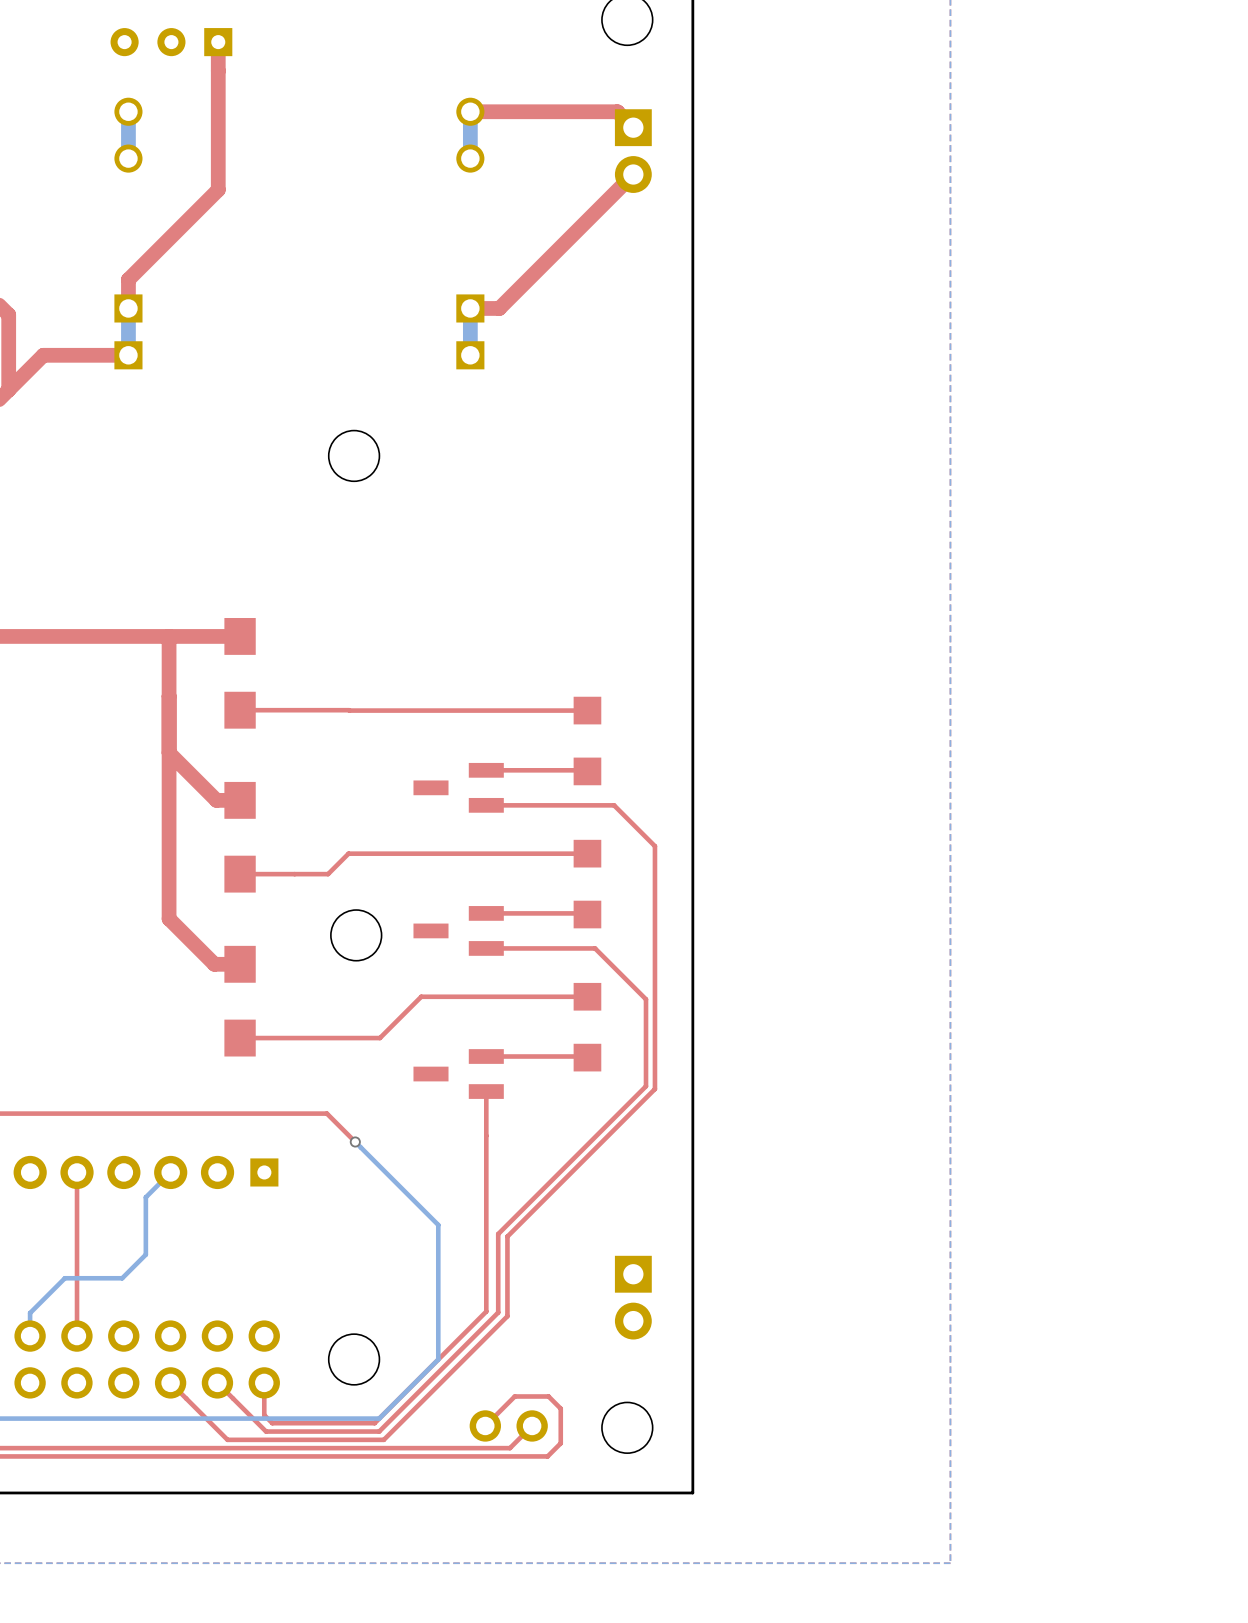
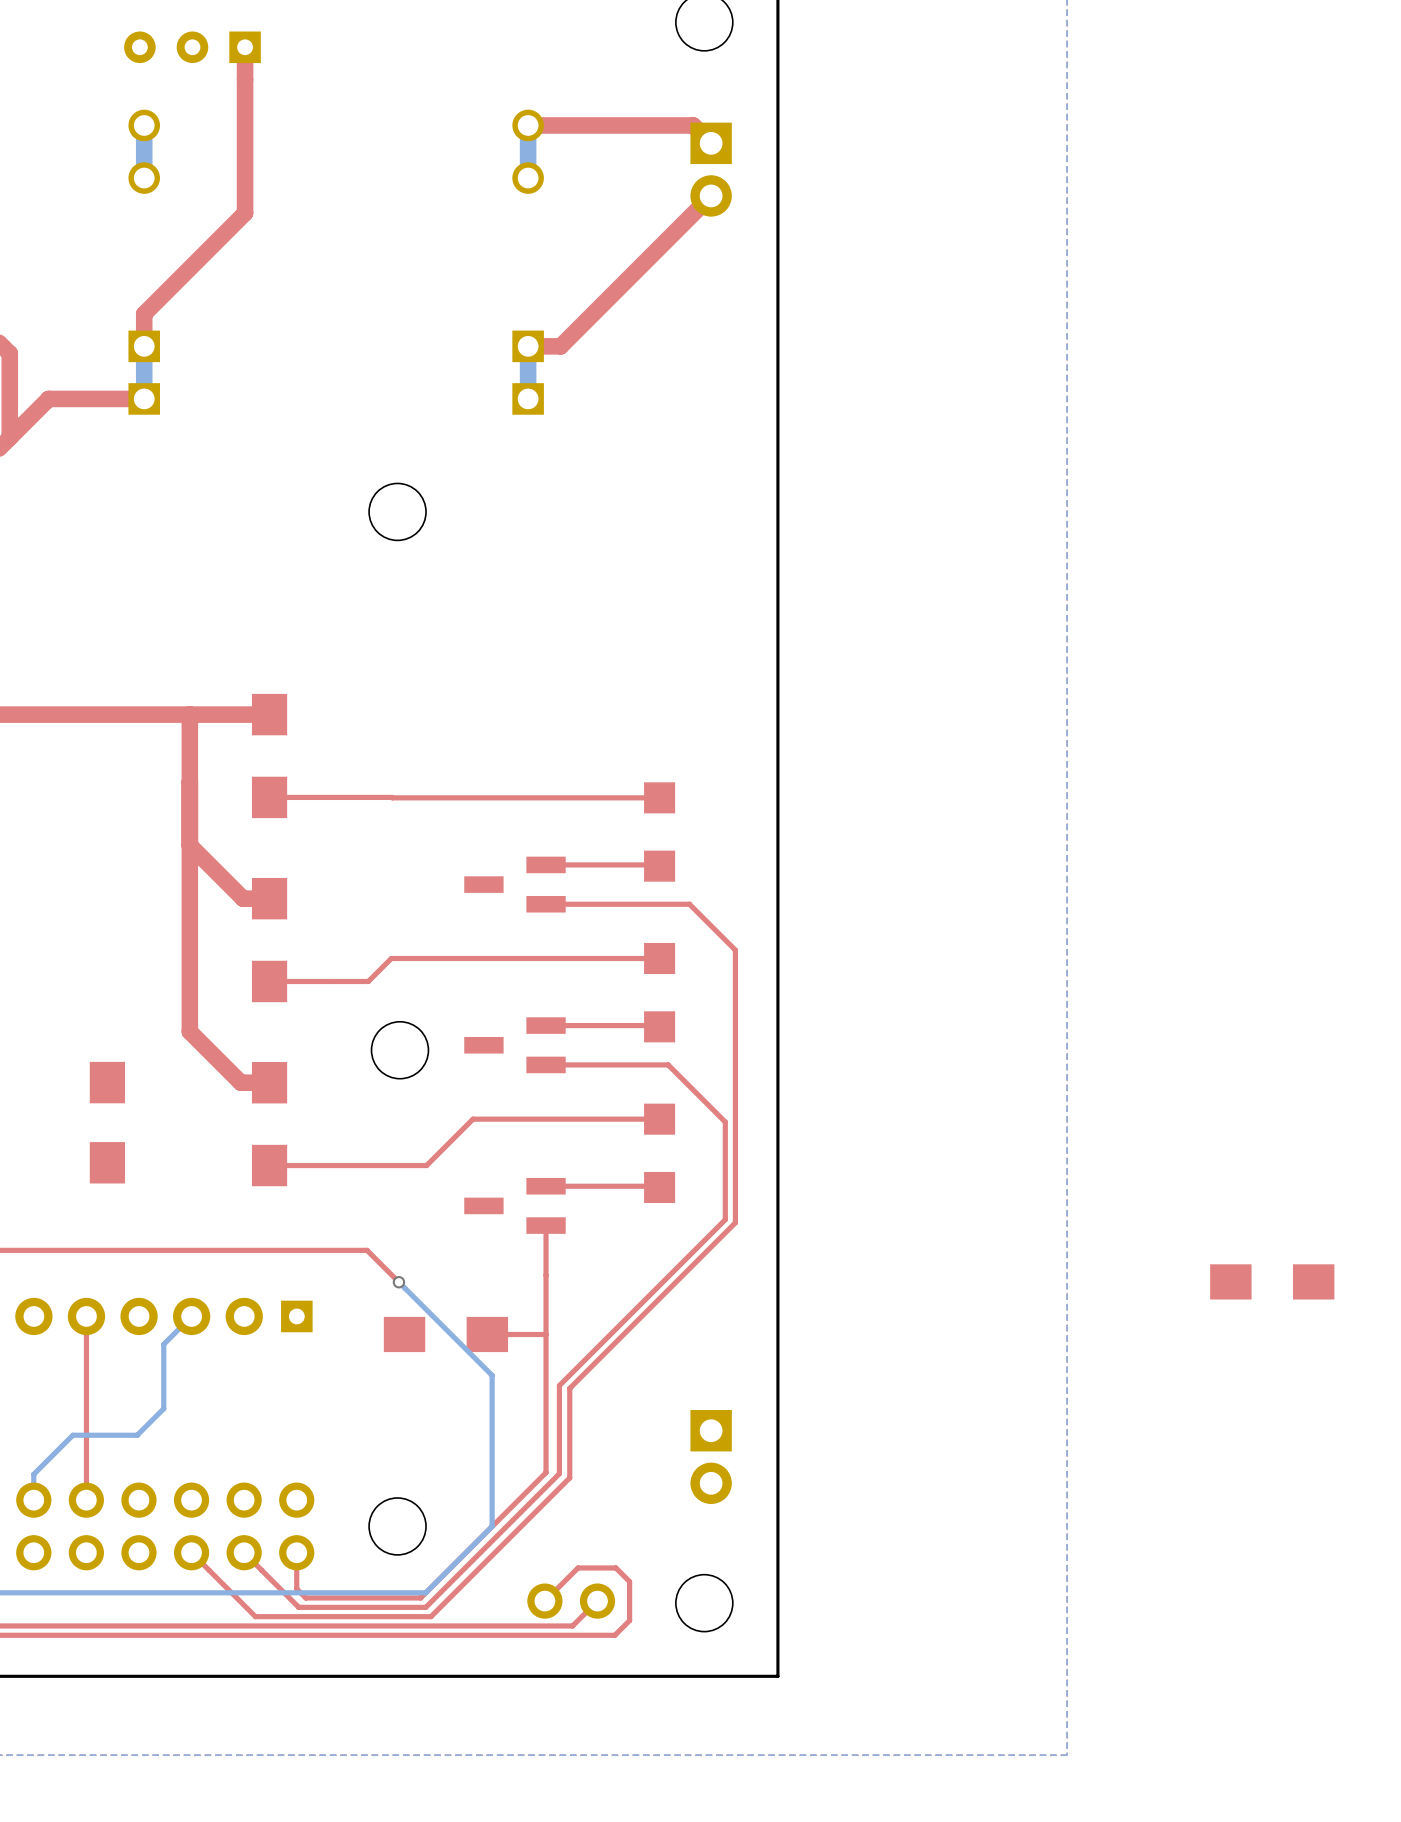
part: none -> (107, 1122)
part: none -> (1272, 1281)
part: none -> (445, 1334)
top track: none -> (546, 1334) (487, 1334)

